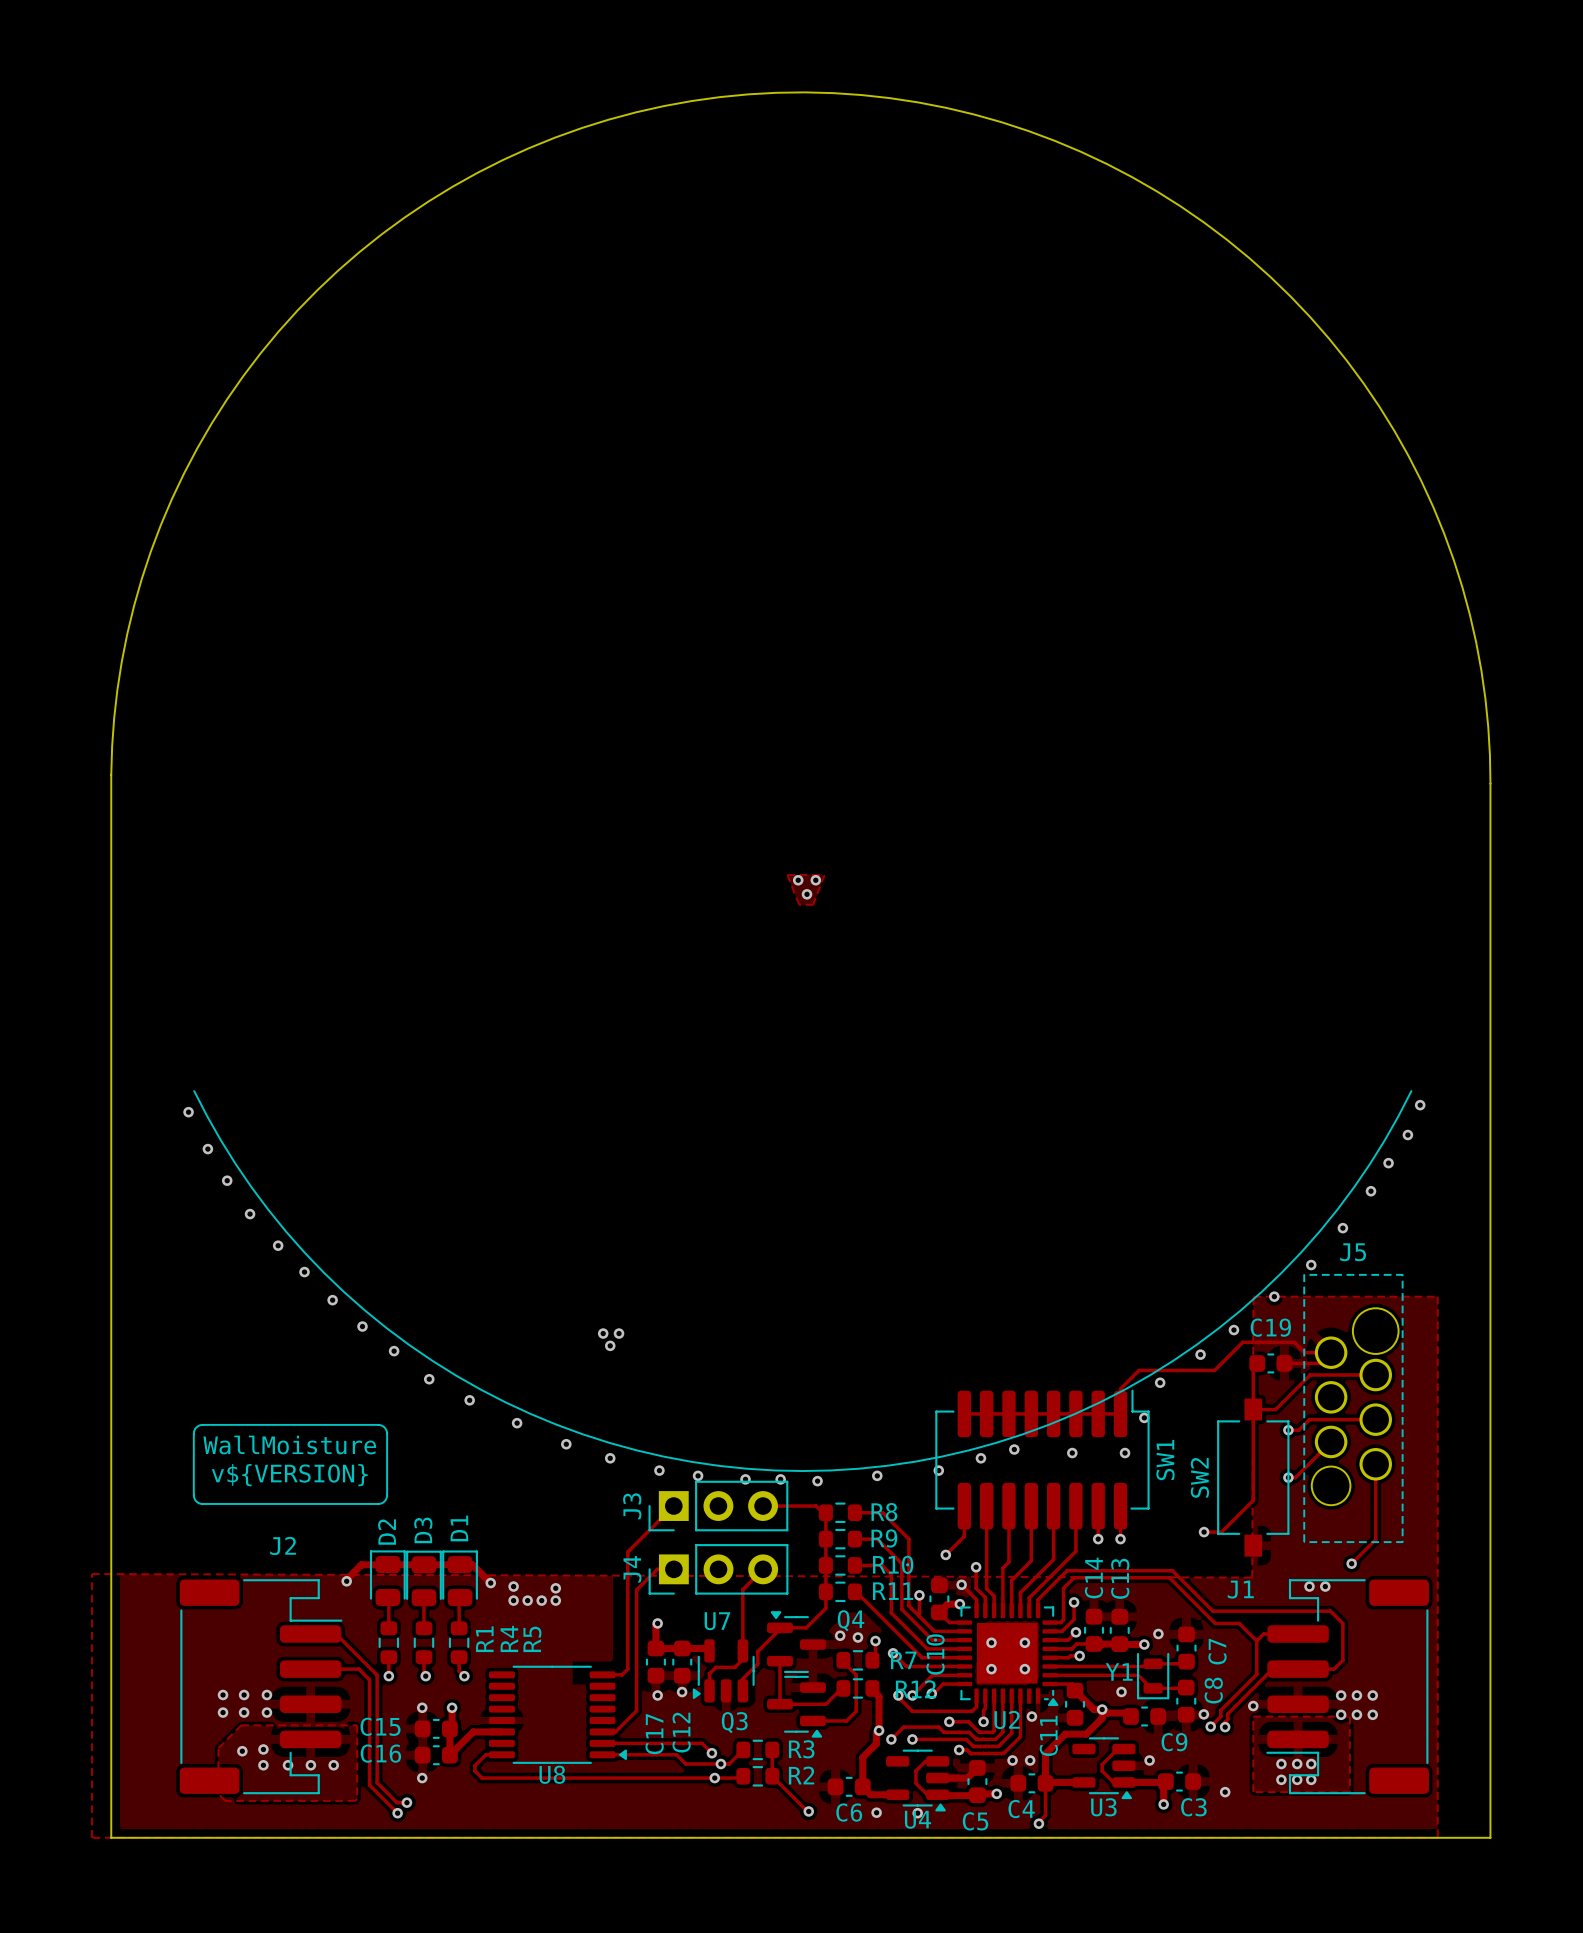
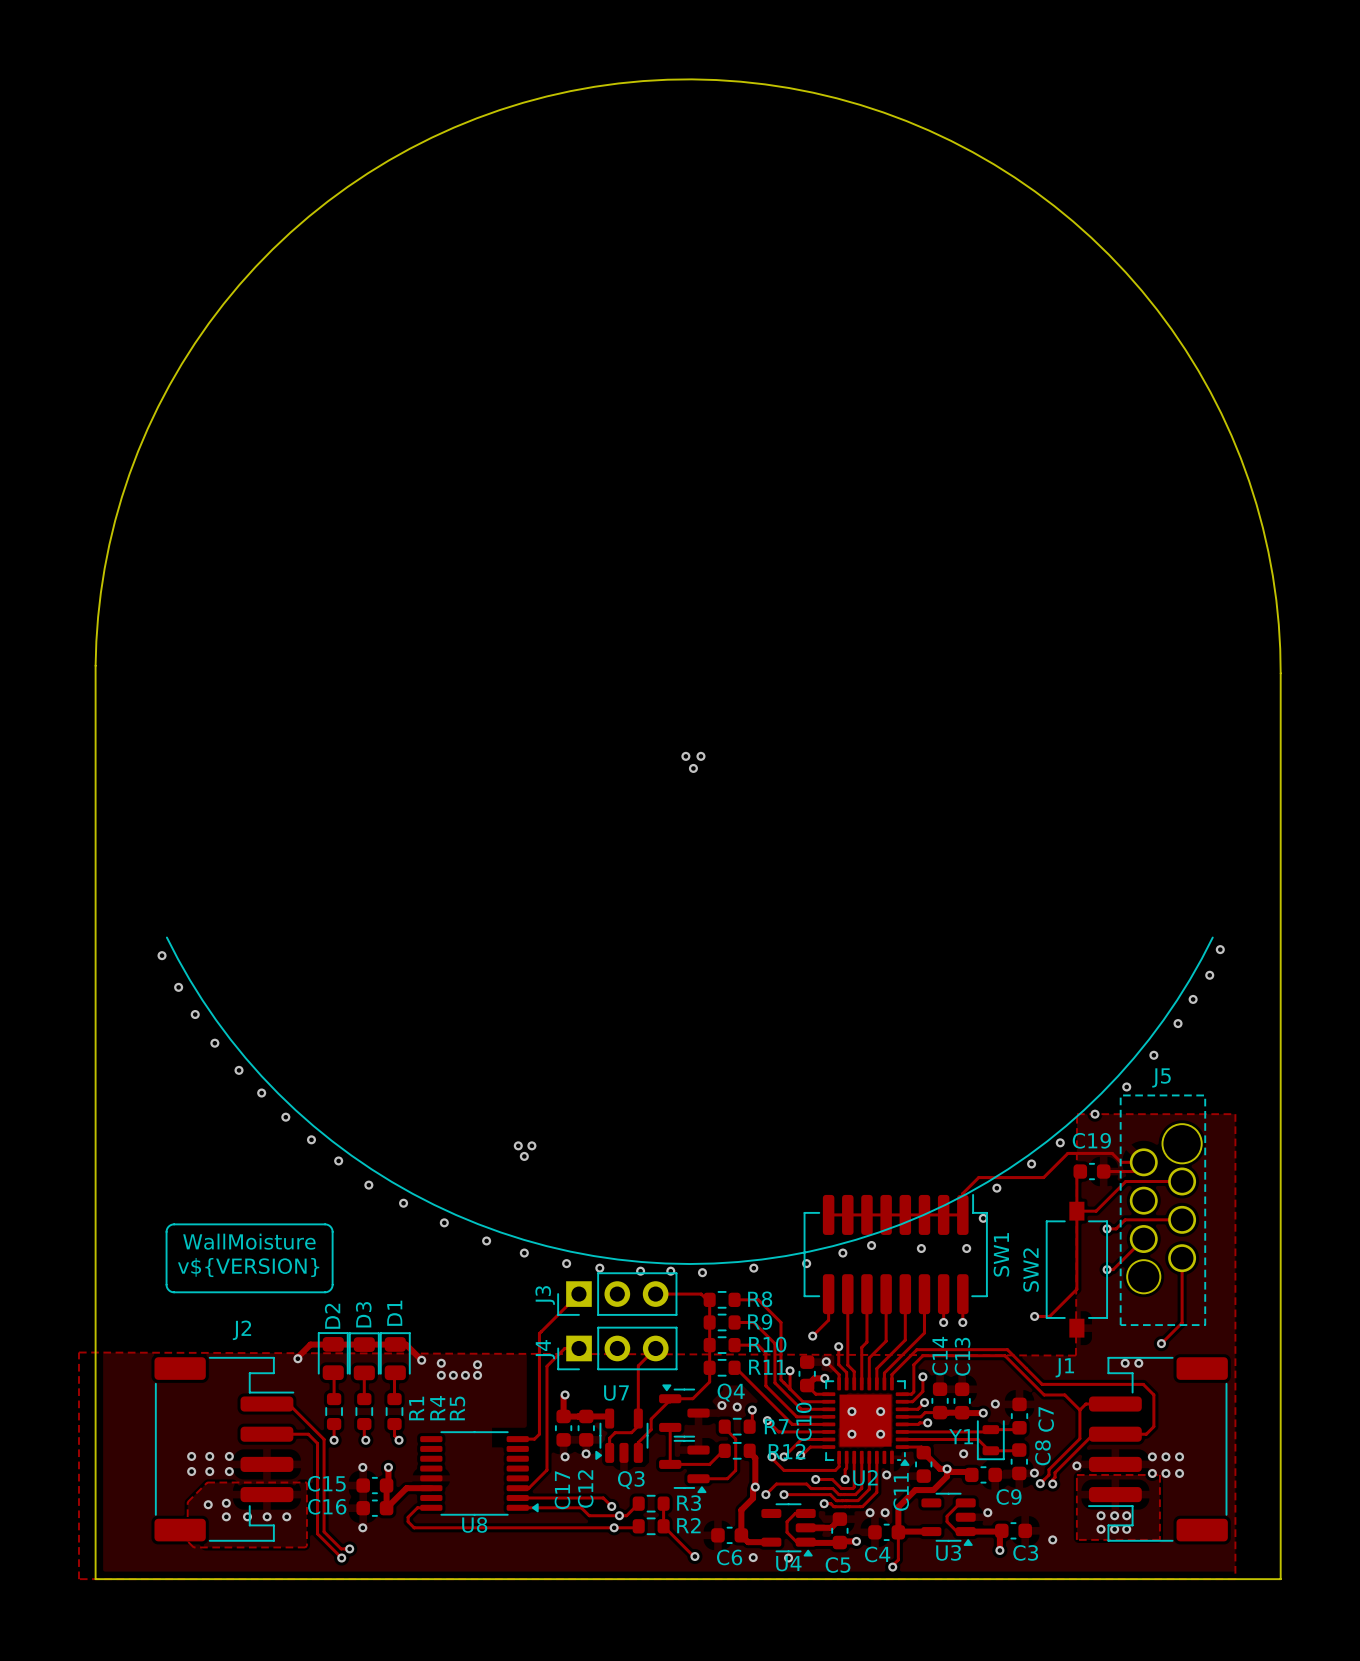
zone outline: (787, 874) (824, 874) (813, 904) (799, 904) (787, 874) -> none

